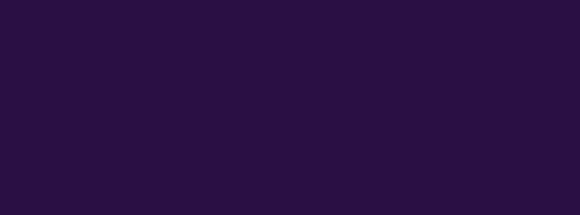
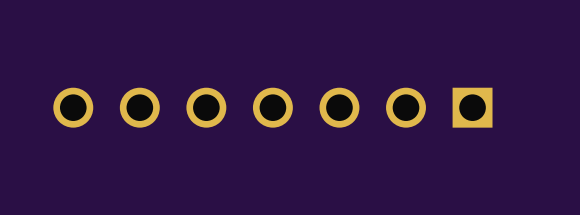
part: none -> (272, 107)

